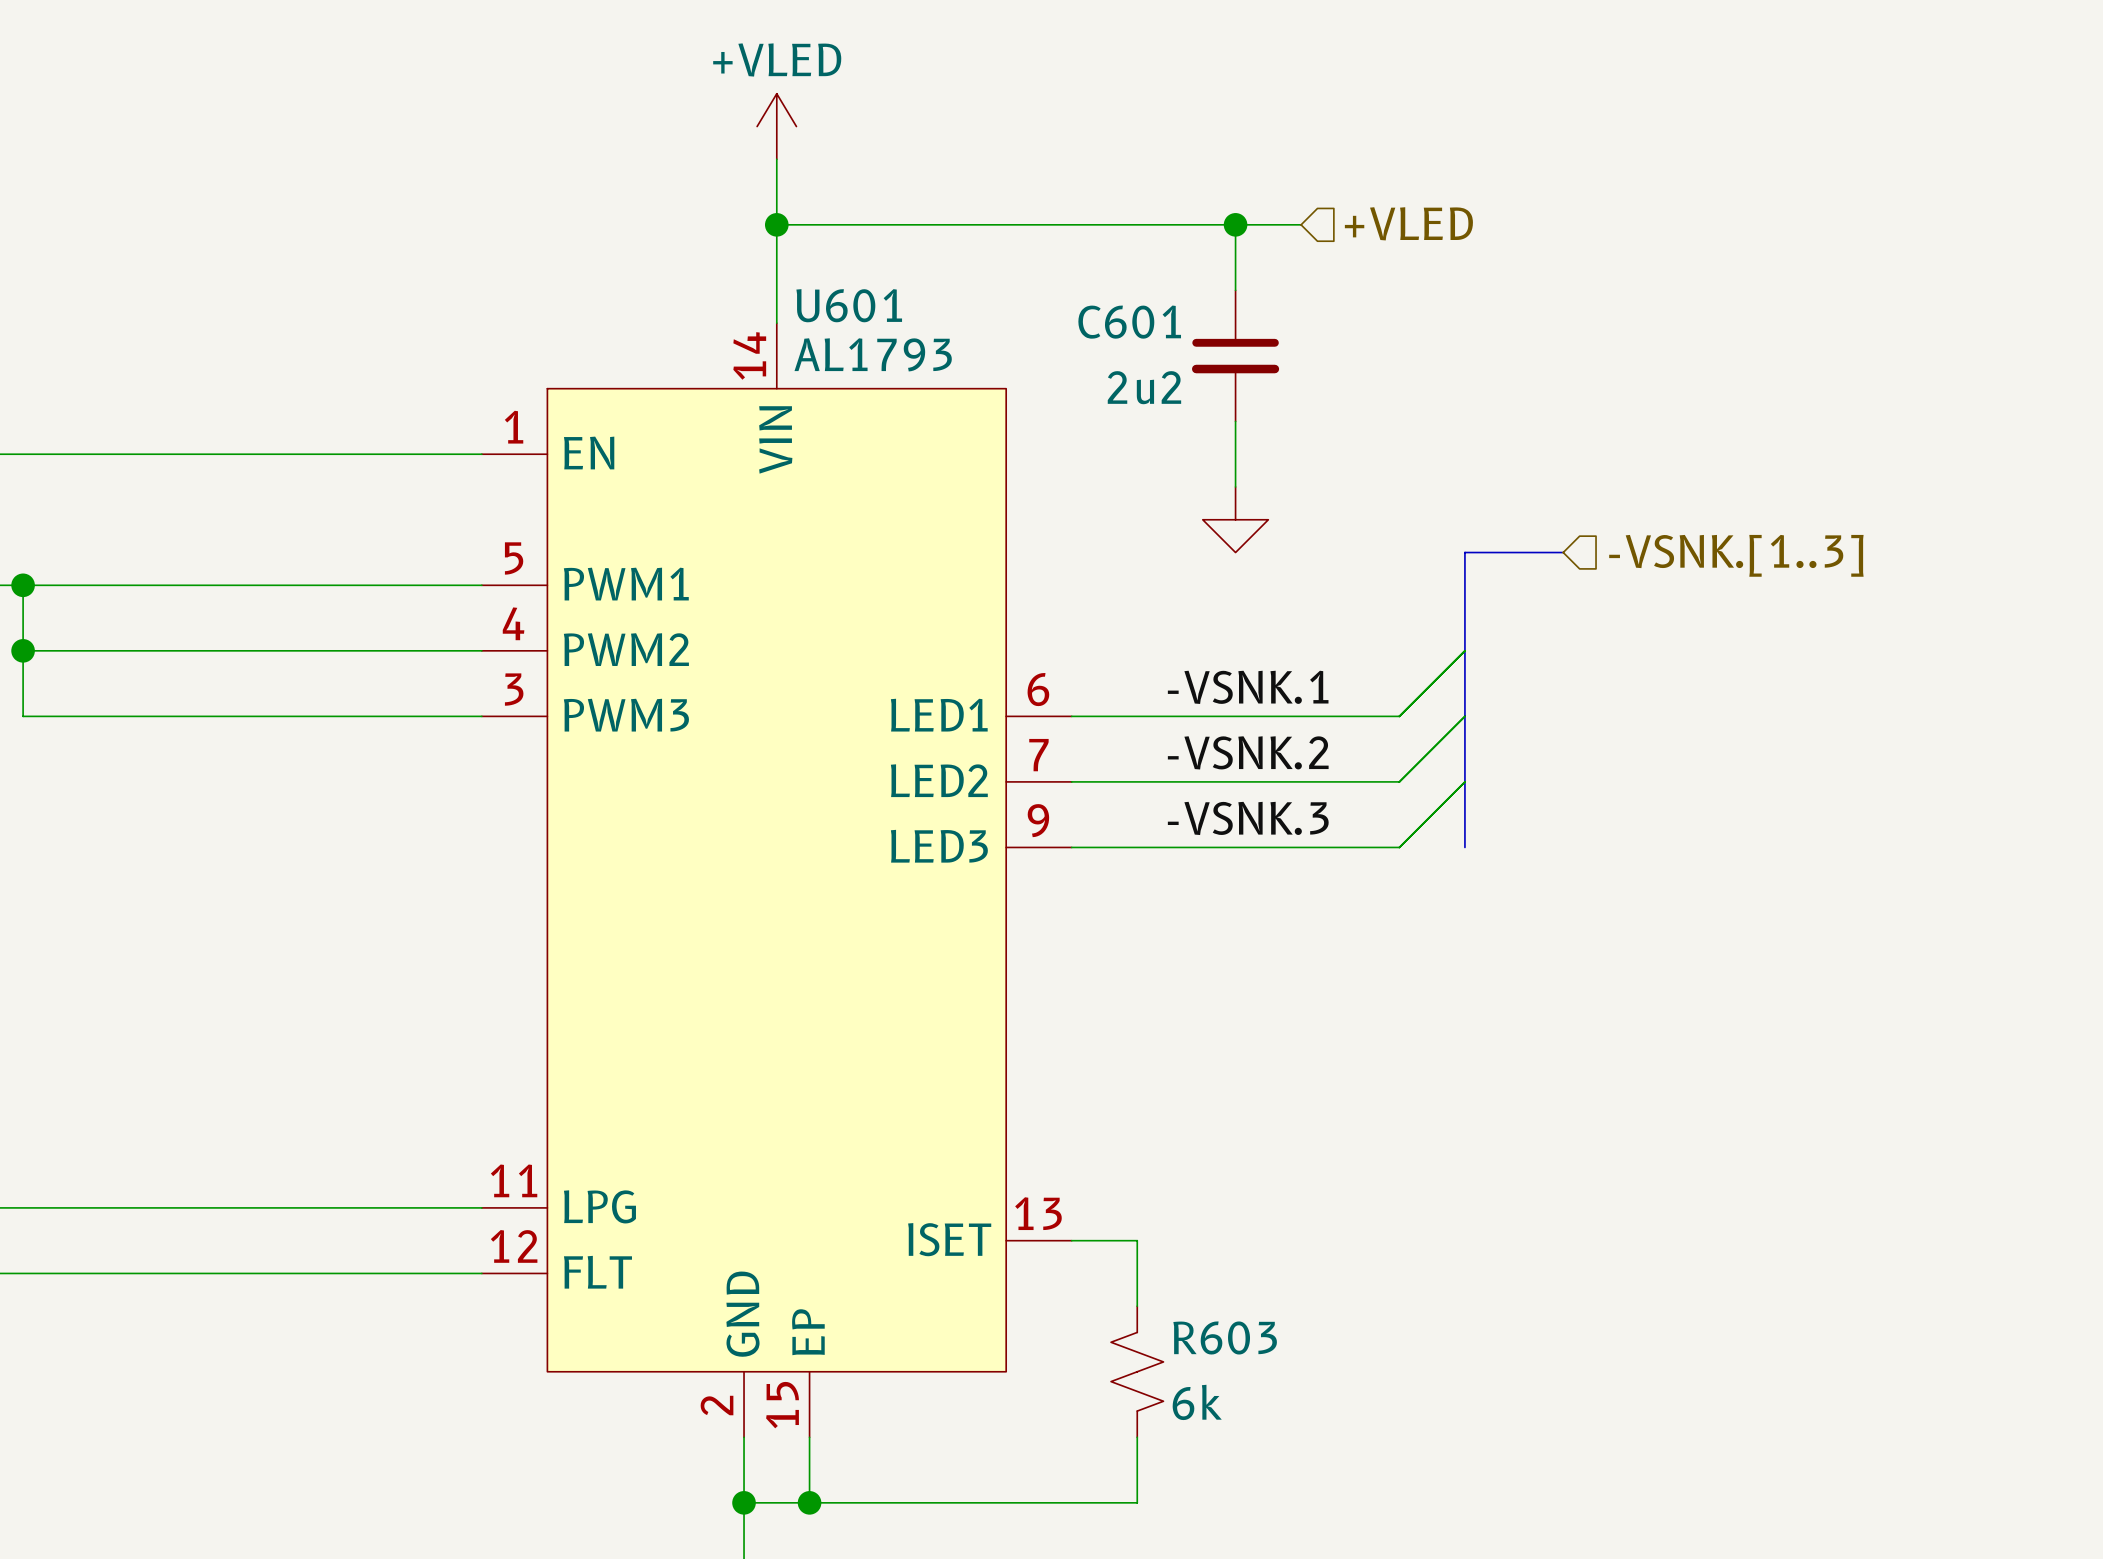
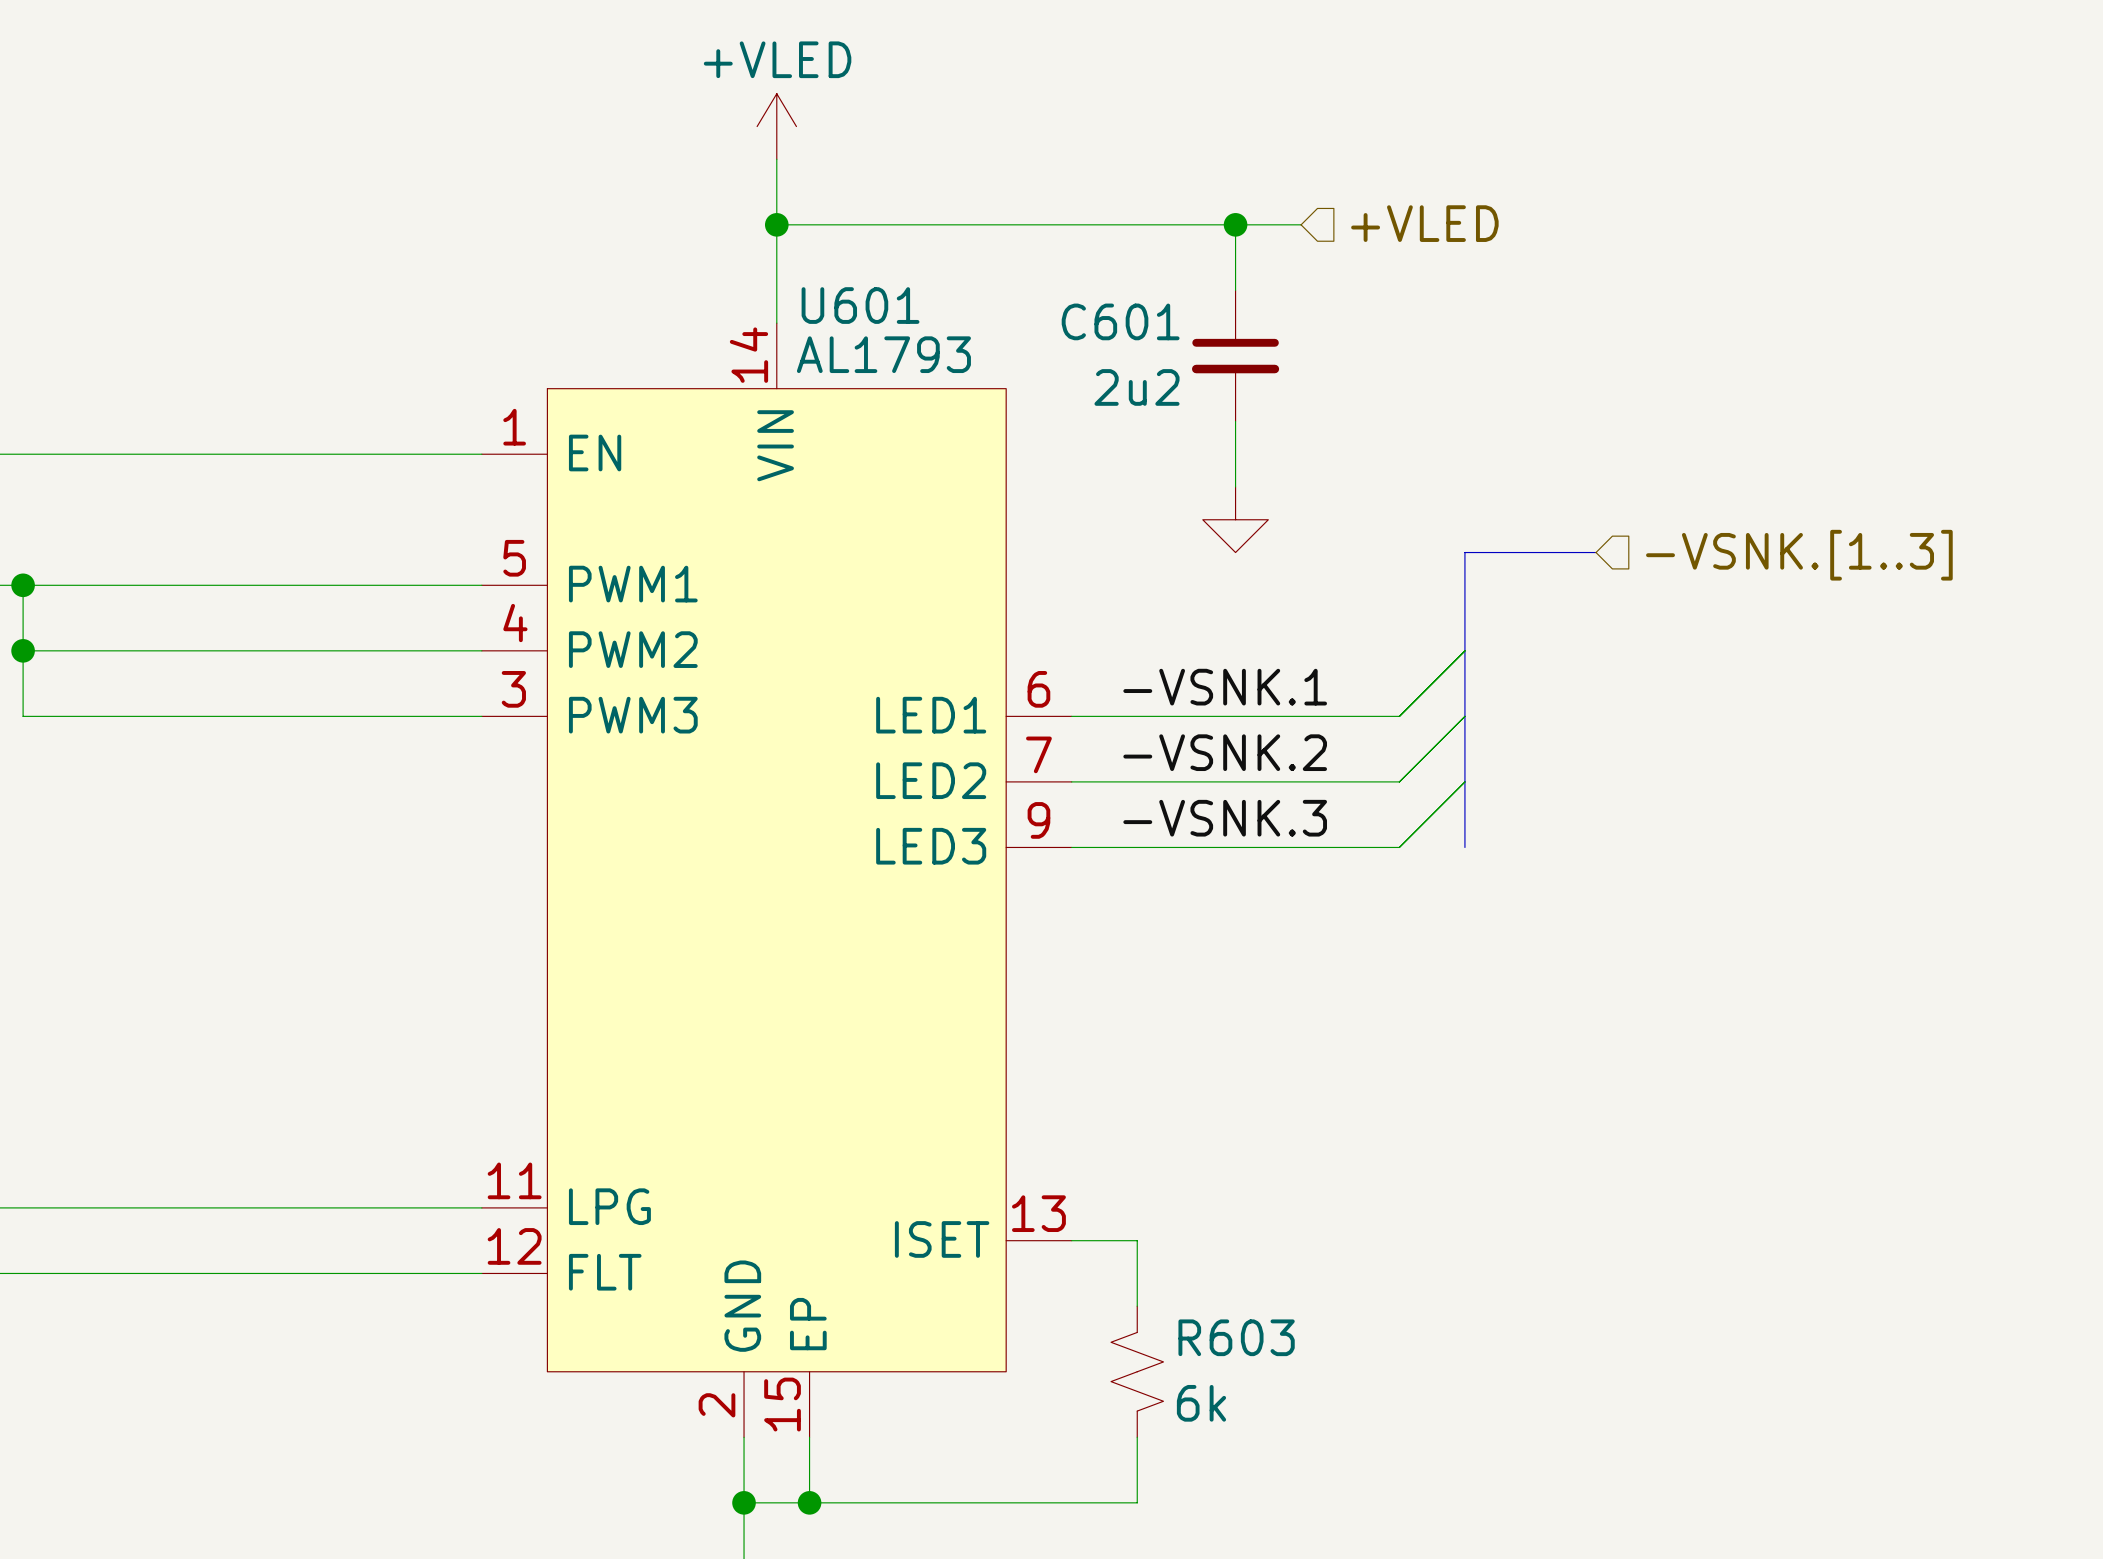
bus: none -> (1563, 552) (1596, 552)
hierarchical label position: -VSNK.[1..3] (1736, 555) -> -VSNK.[1..3] (1799, 555)

